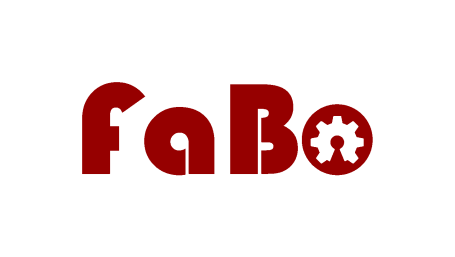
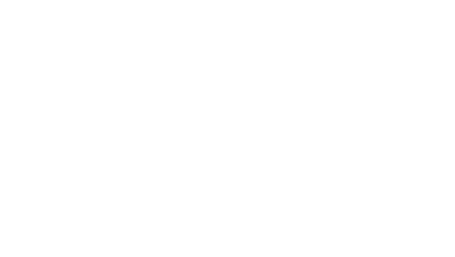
part: (227, 128) -> none

